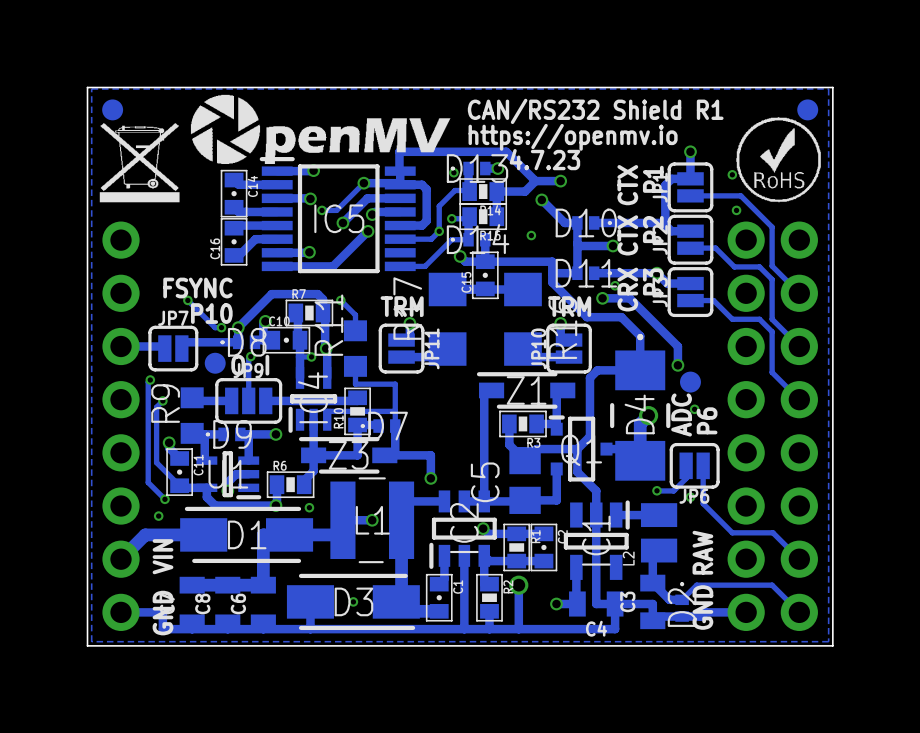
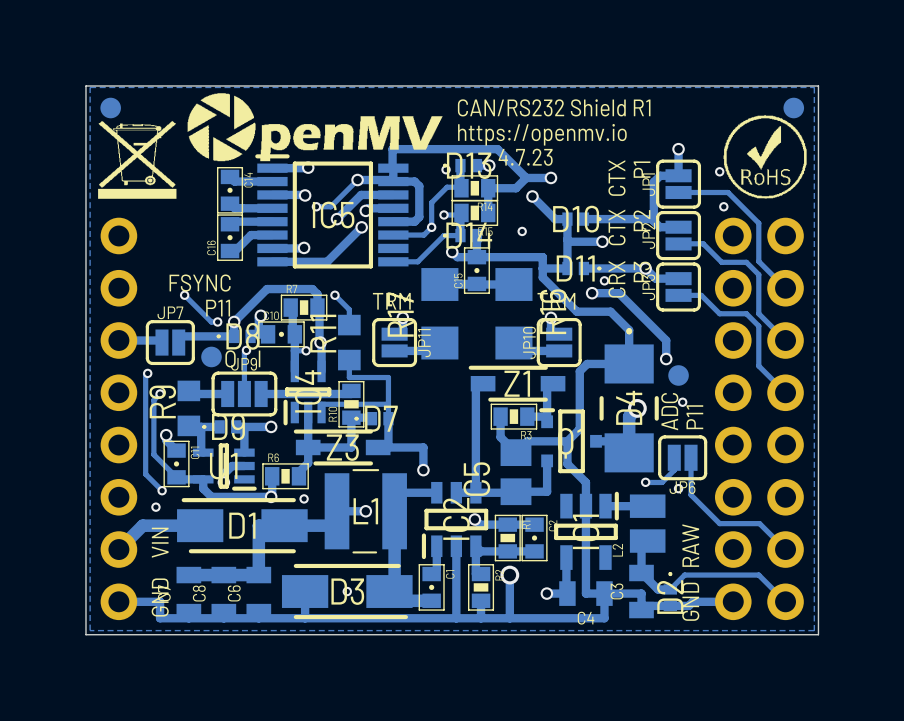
text: P10 (211, 313) -> P11 (218, 308)
text: P6 (707, 420) -> P11 (694, 417)

